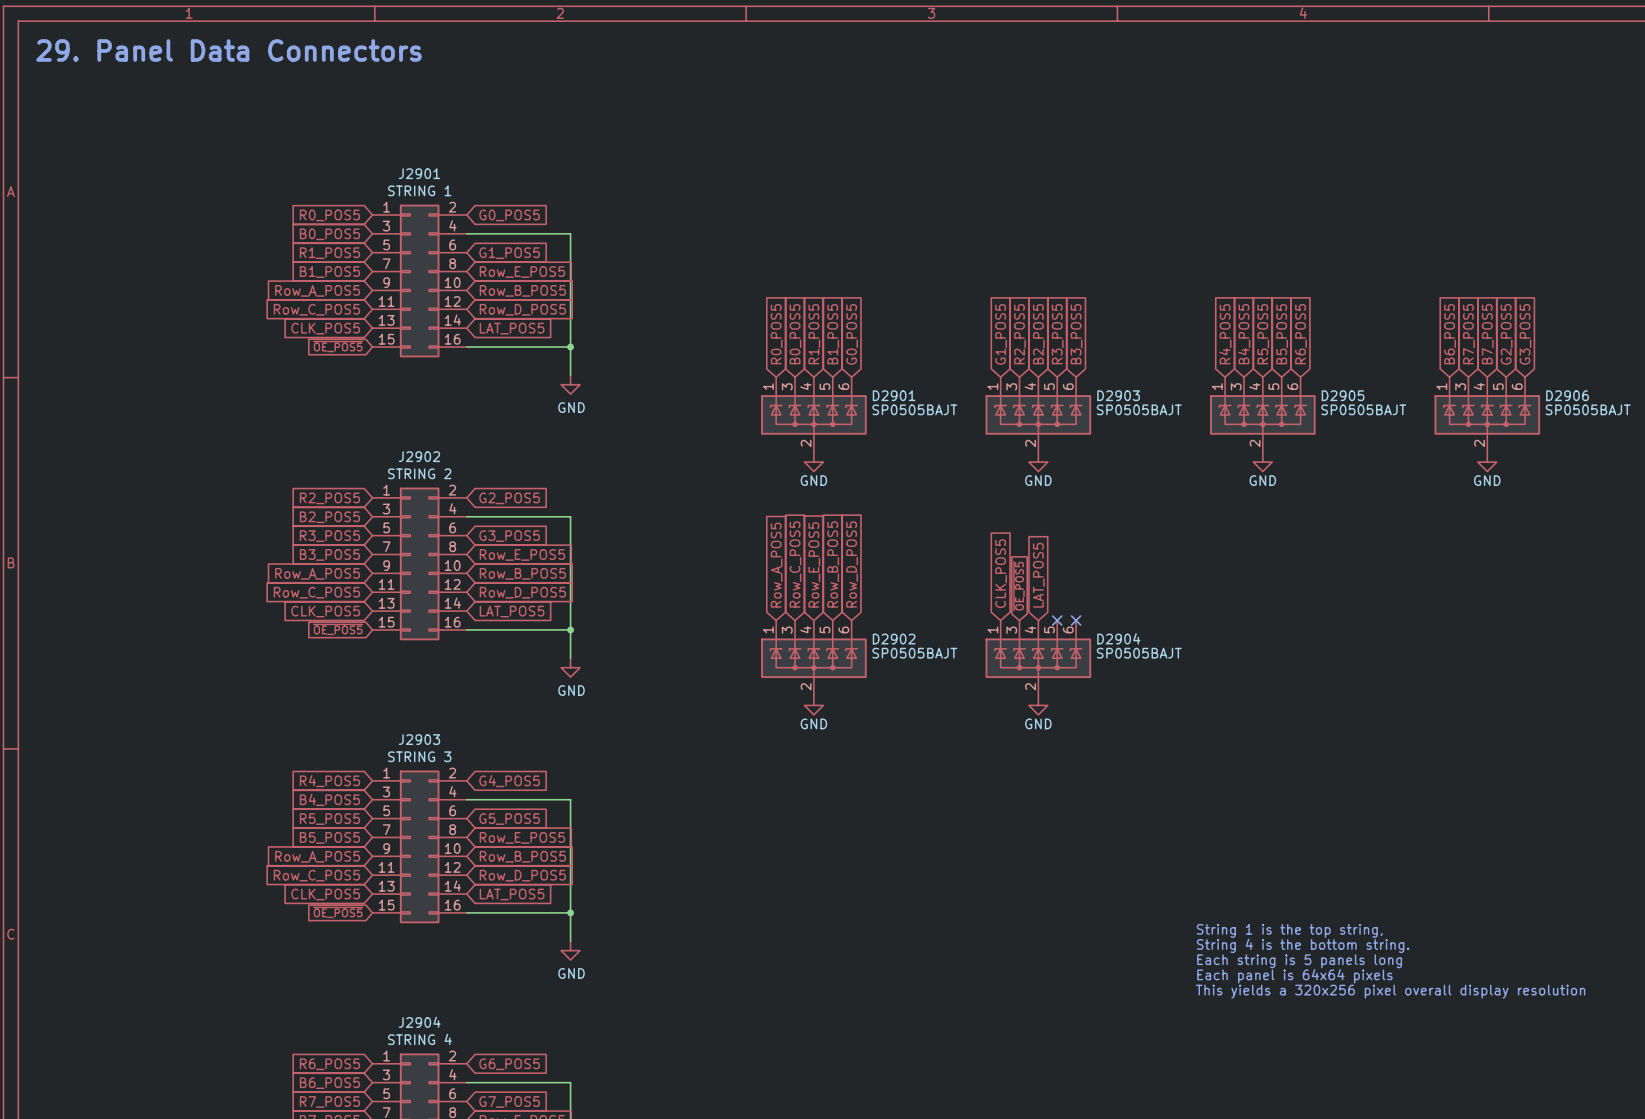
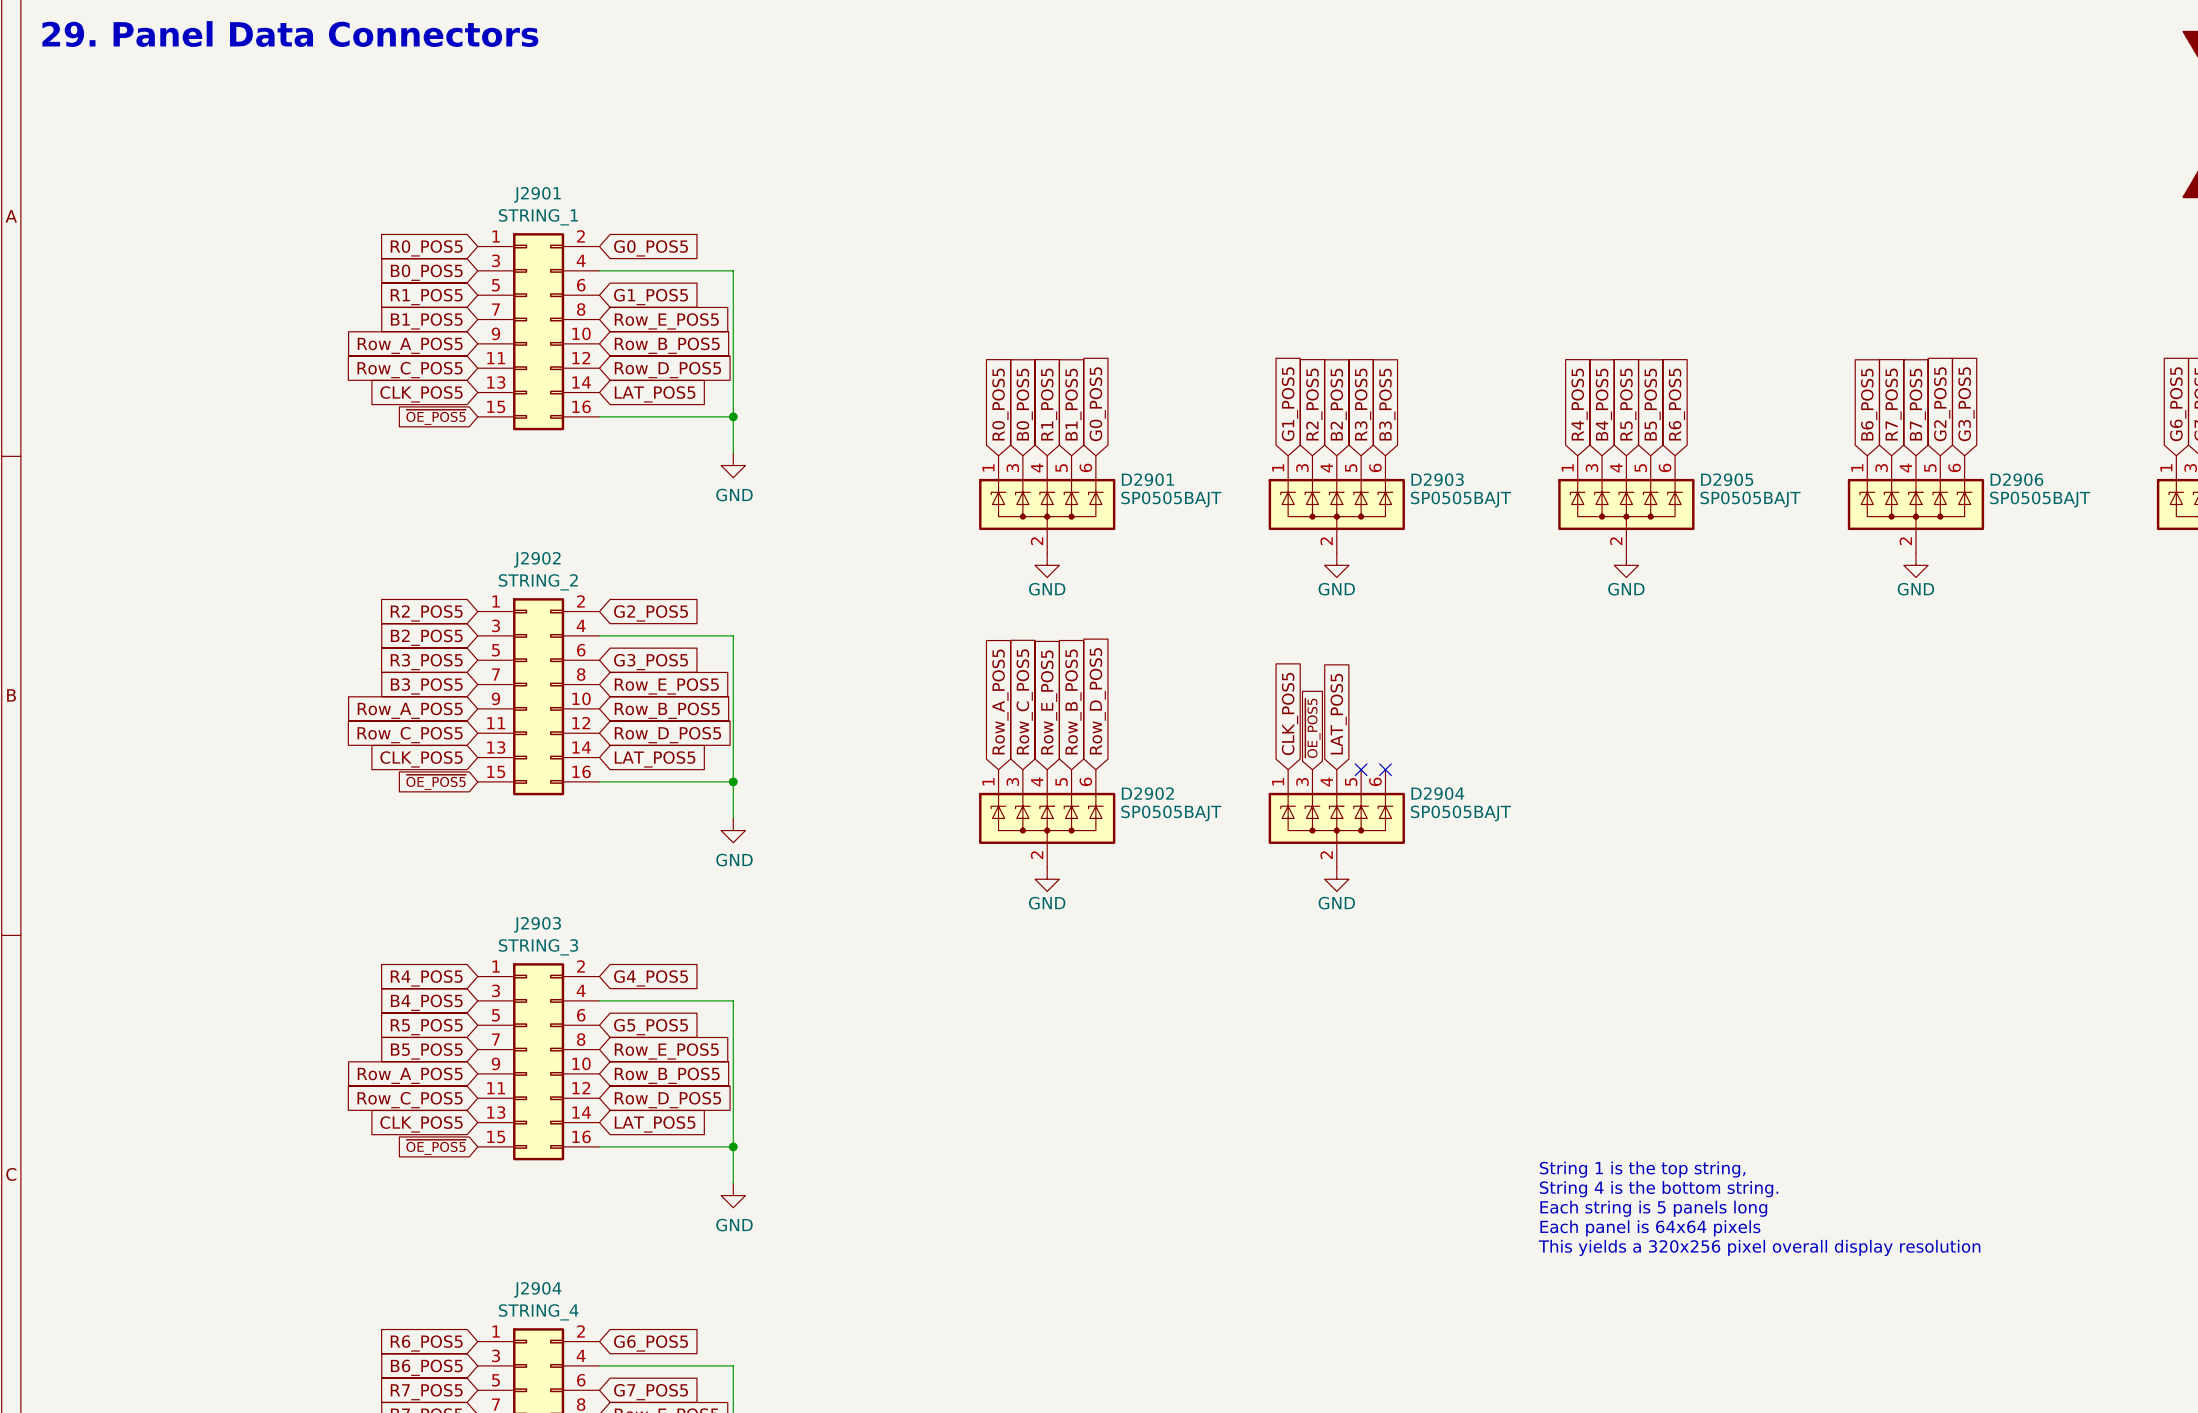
J2901 value: STRING 1 (419, 190) -> STRING_1 (538, 217)
J2902 value: STRING 2 (419, 473) -> STRING_2 (538, 582)
J2903 value: STRING 3 (419, 756) -> STRING_3 (538, 947)
J2904 value: STRING 4 (419, 1039) -> STRING_4 (538, 1312)

